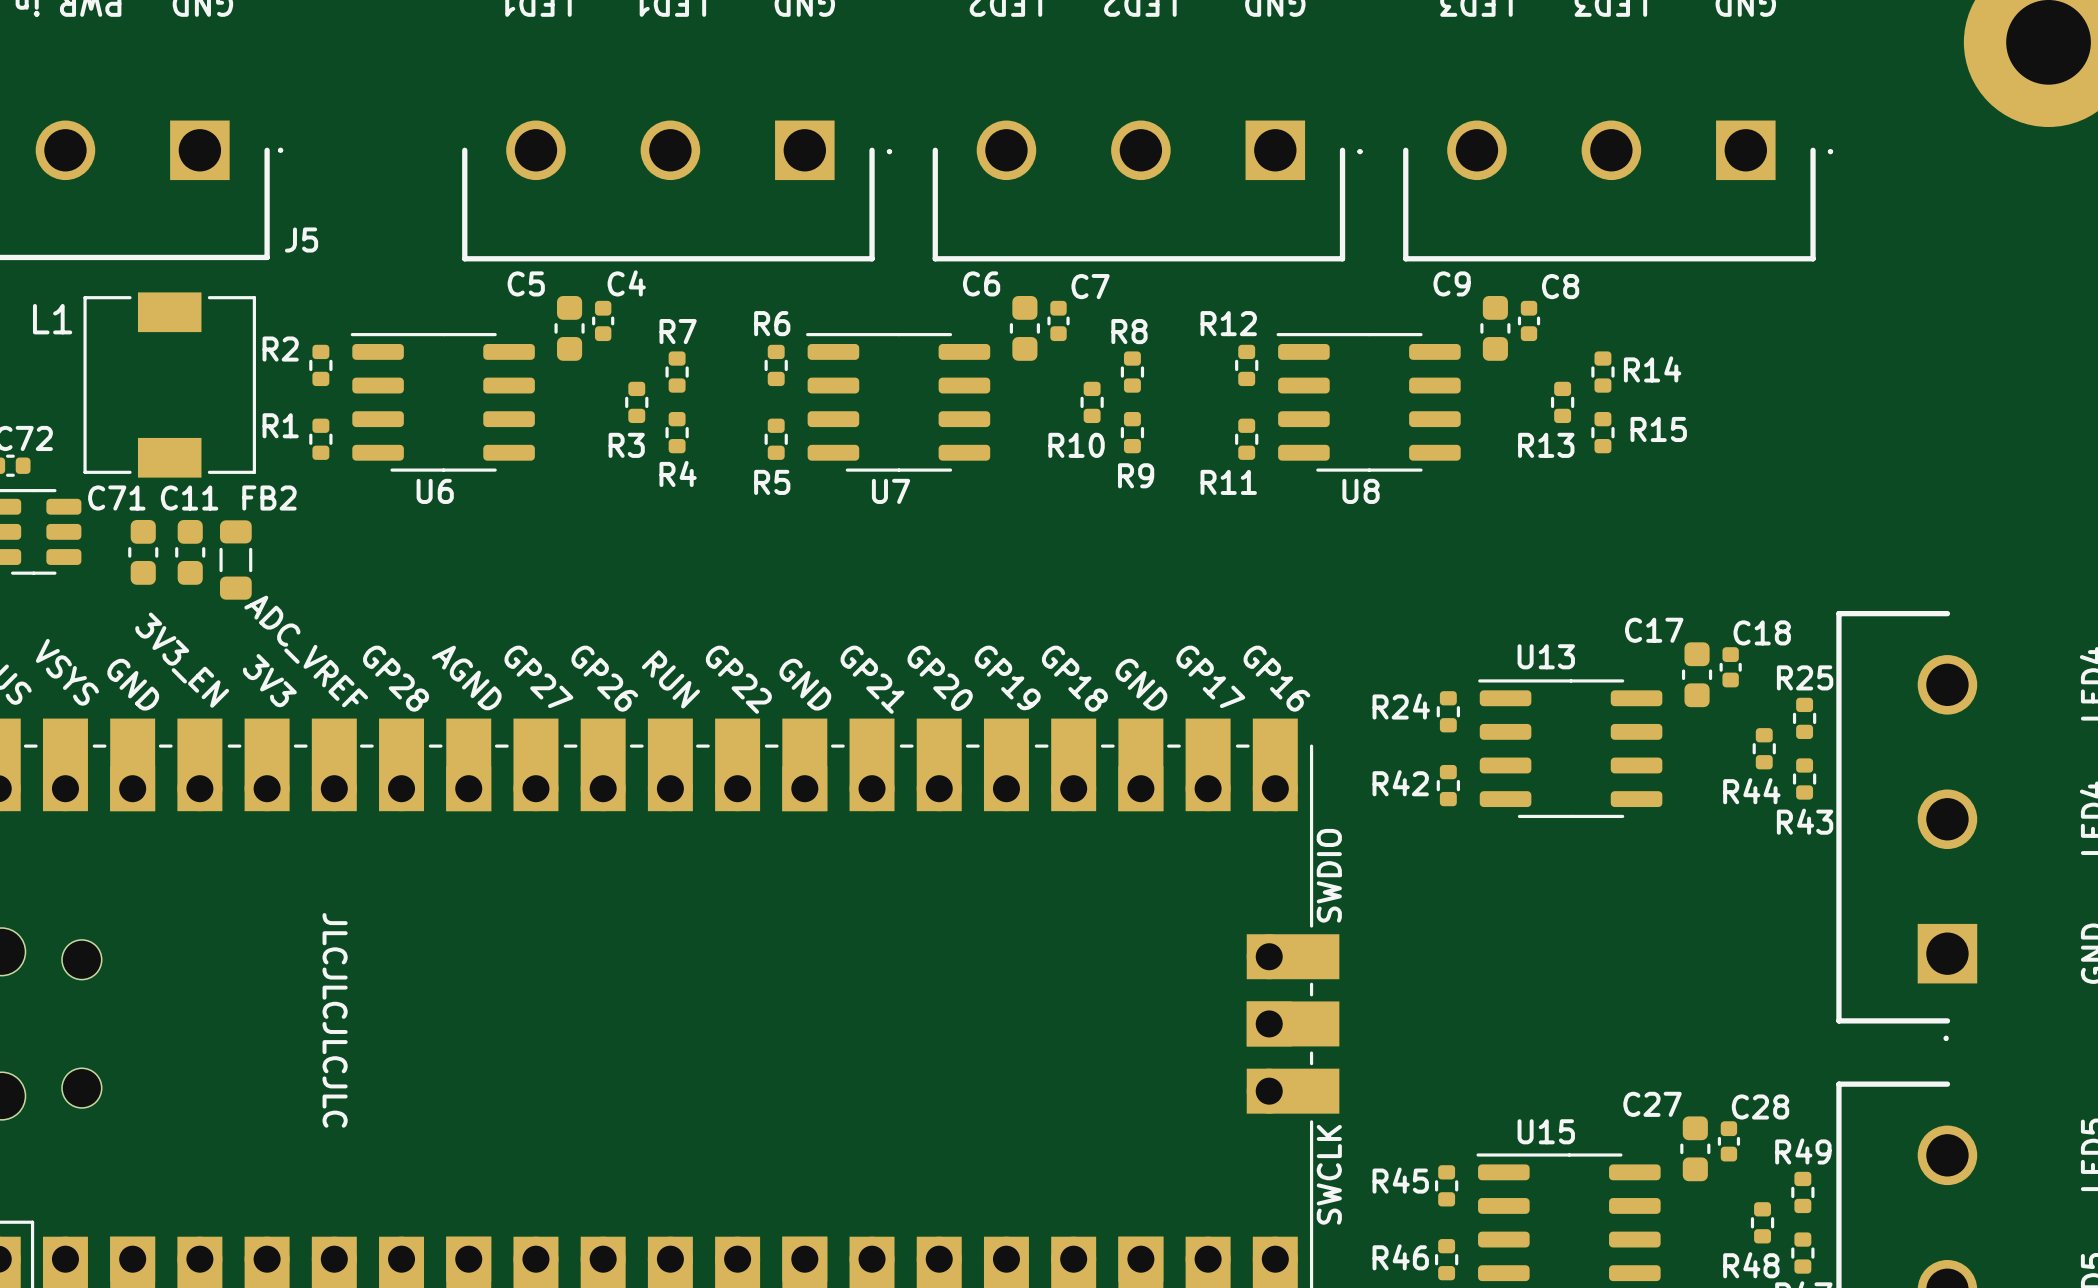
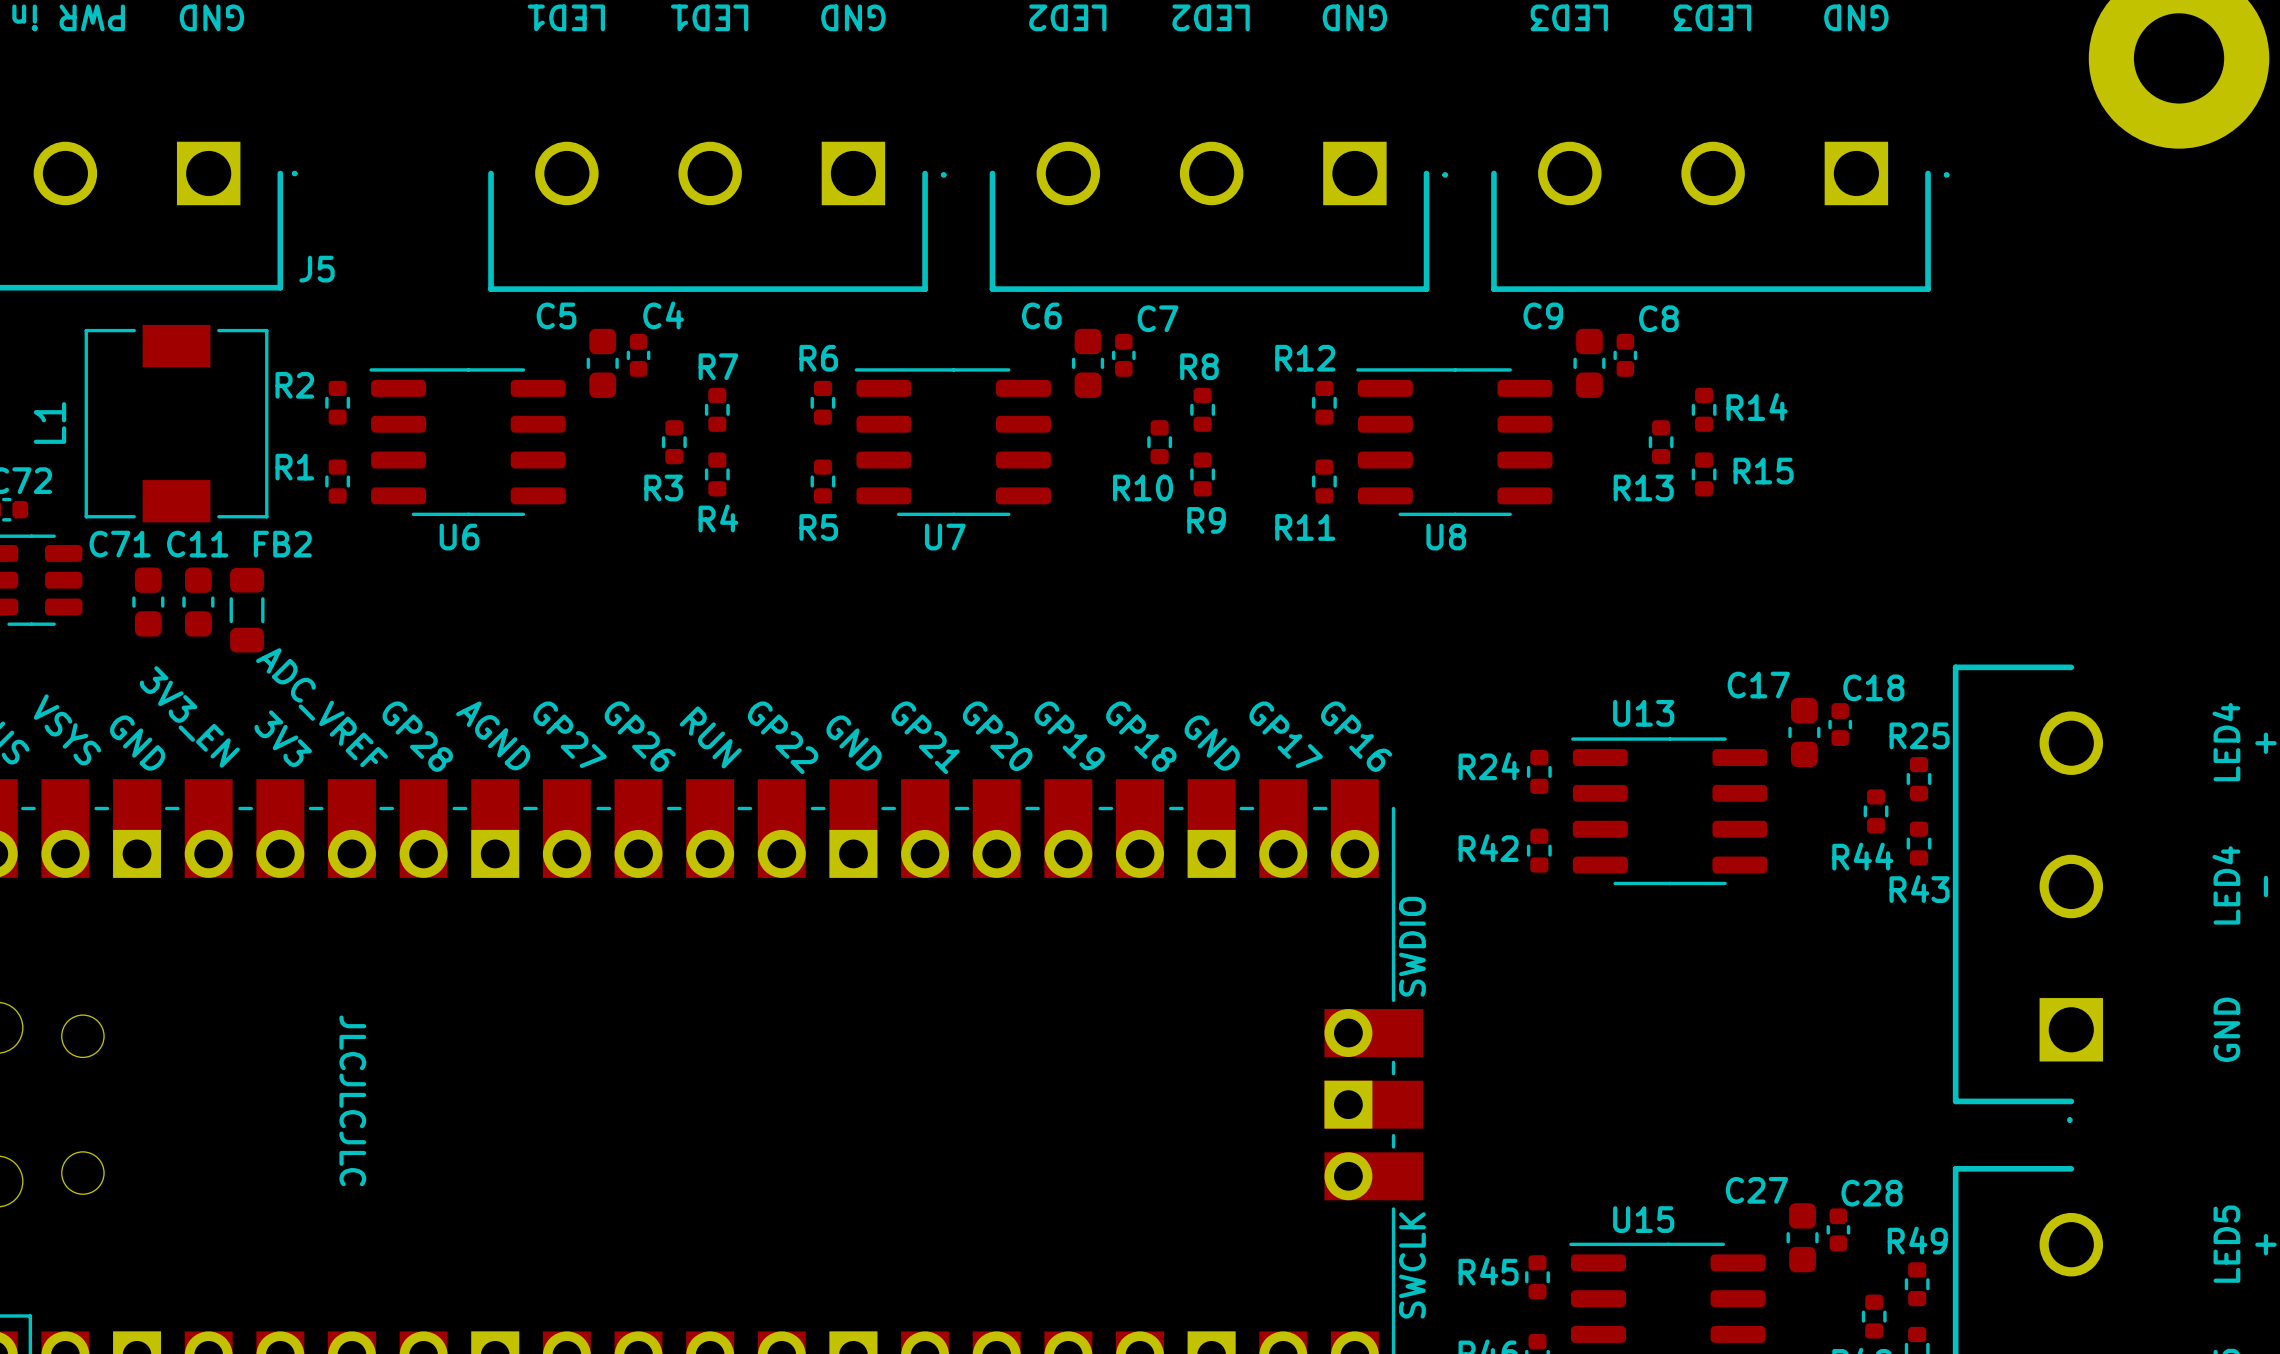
L1 name rotation: 0° (52, 319) -> 90° counterclockwise (49, 422)
L1 name position: L1 (52, 319) -> L1 (49, 422)
text: JLCJLCJLCJLC (335, 1020) -> JLCJLCJLC (352, 1100)

